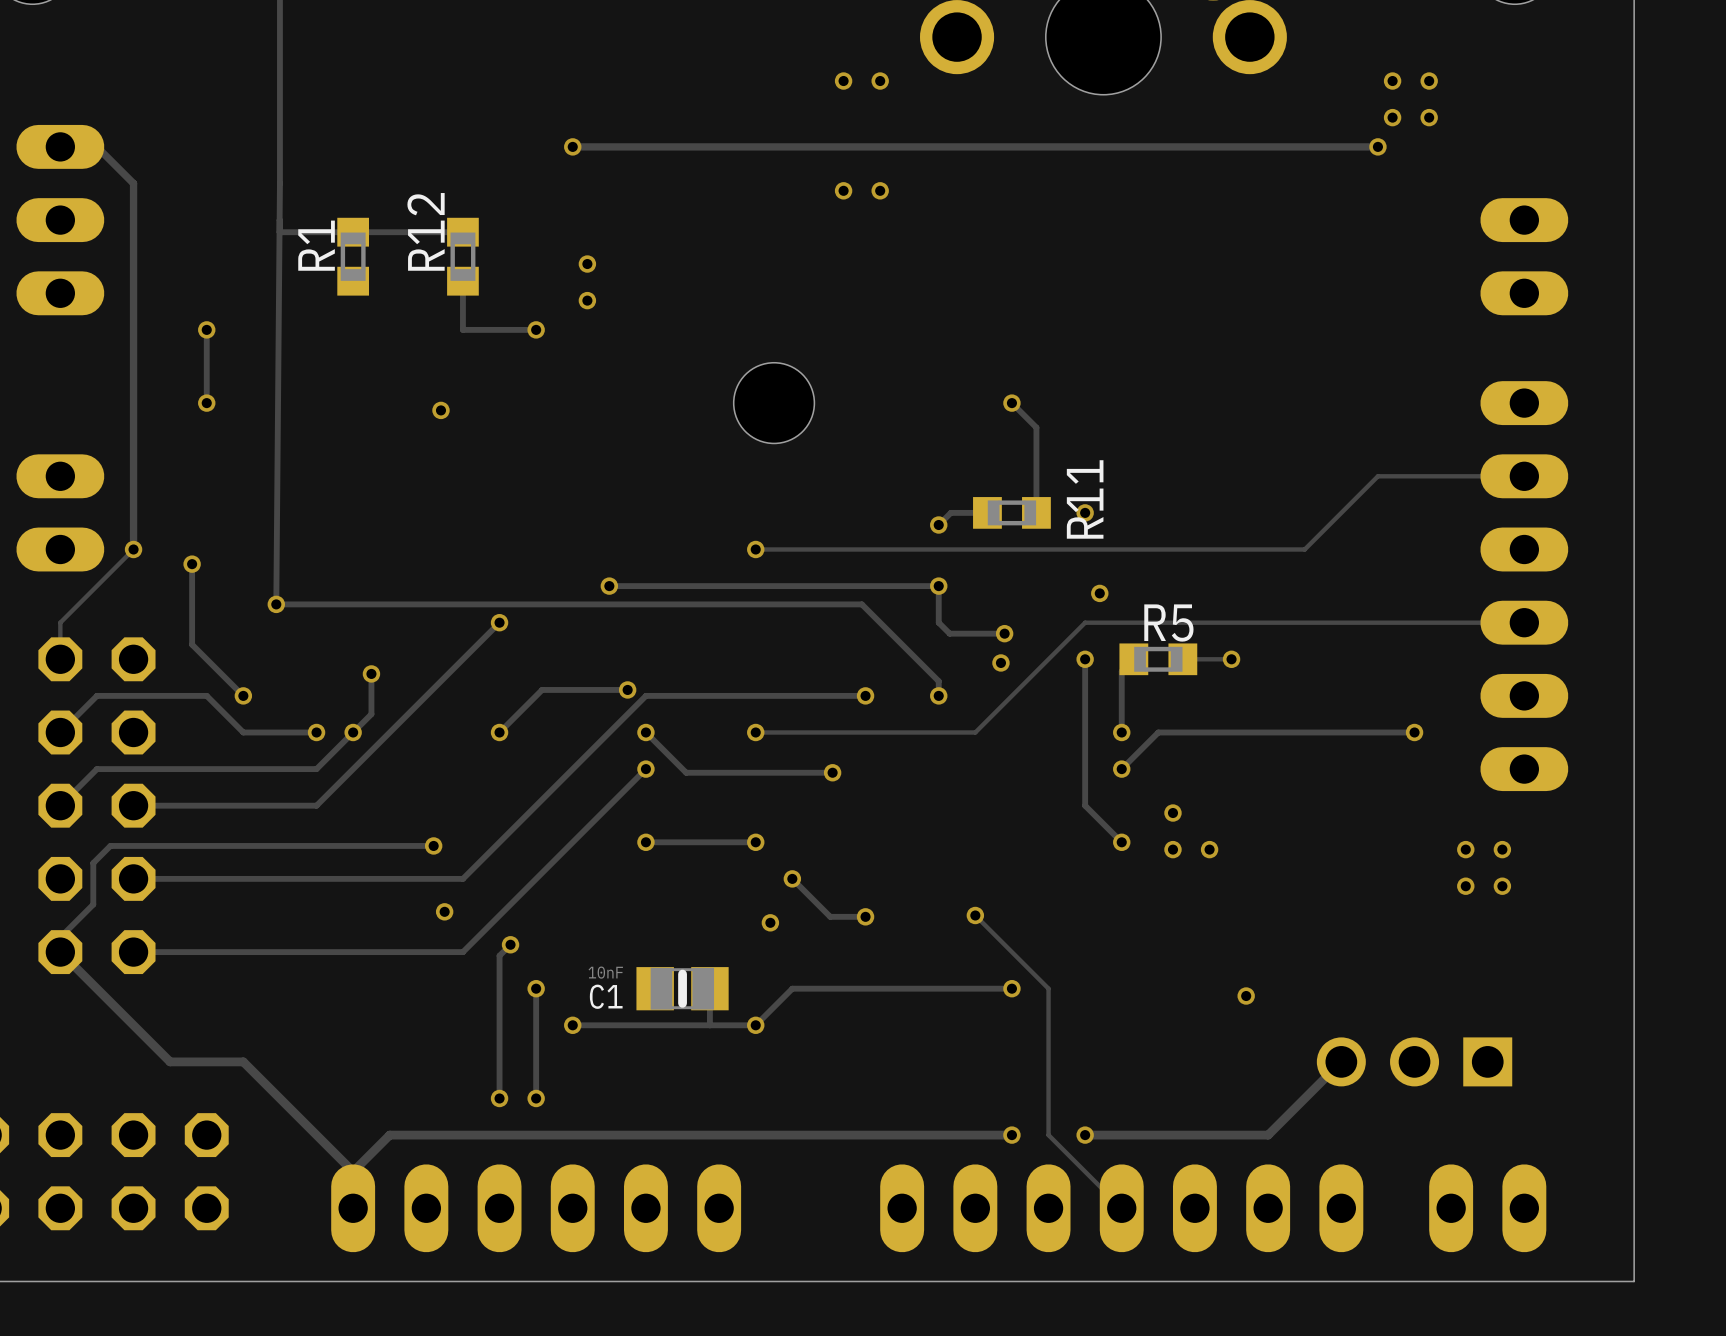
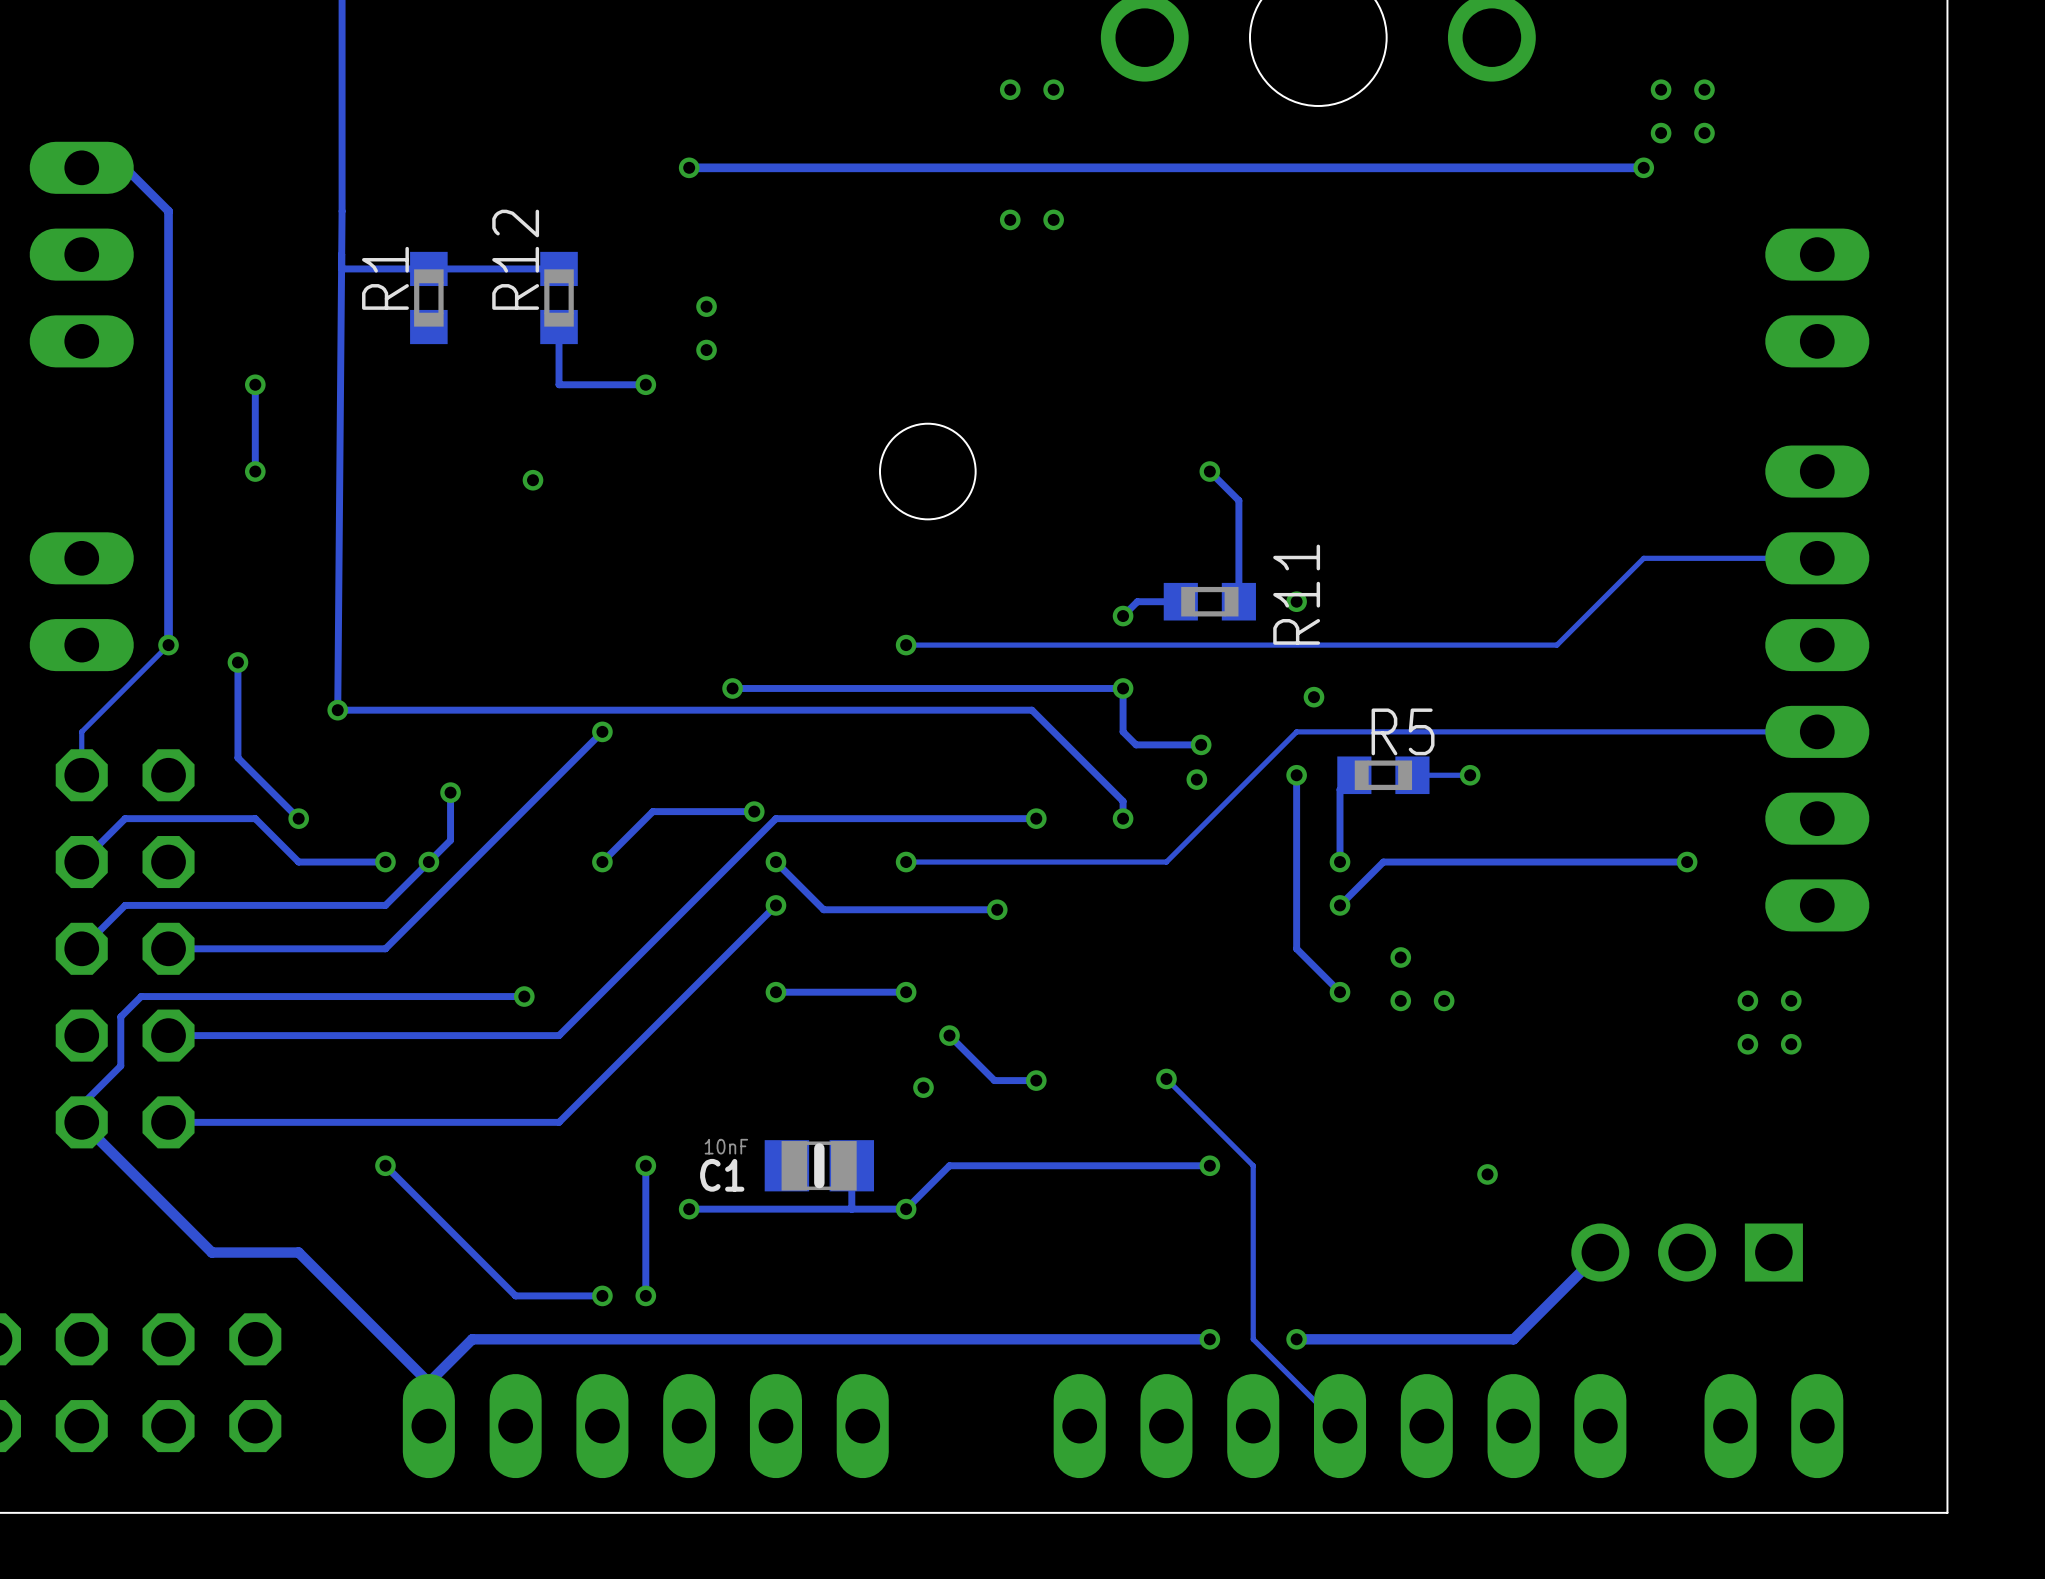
via: (444, 911) -> none
track: (510, 944) (499, 955) (499, 1098) -> (385, 1165) (515, 1295) (602, 1295)
via: (510, 944) -> none
via: none -> (385, 1165)

